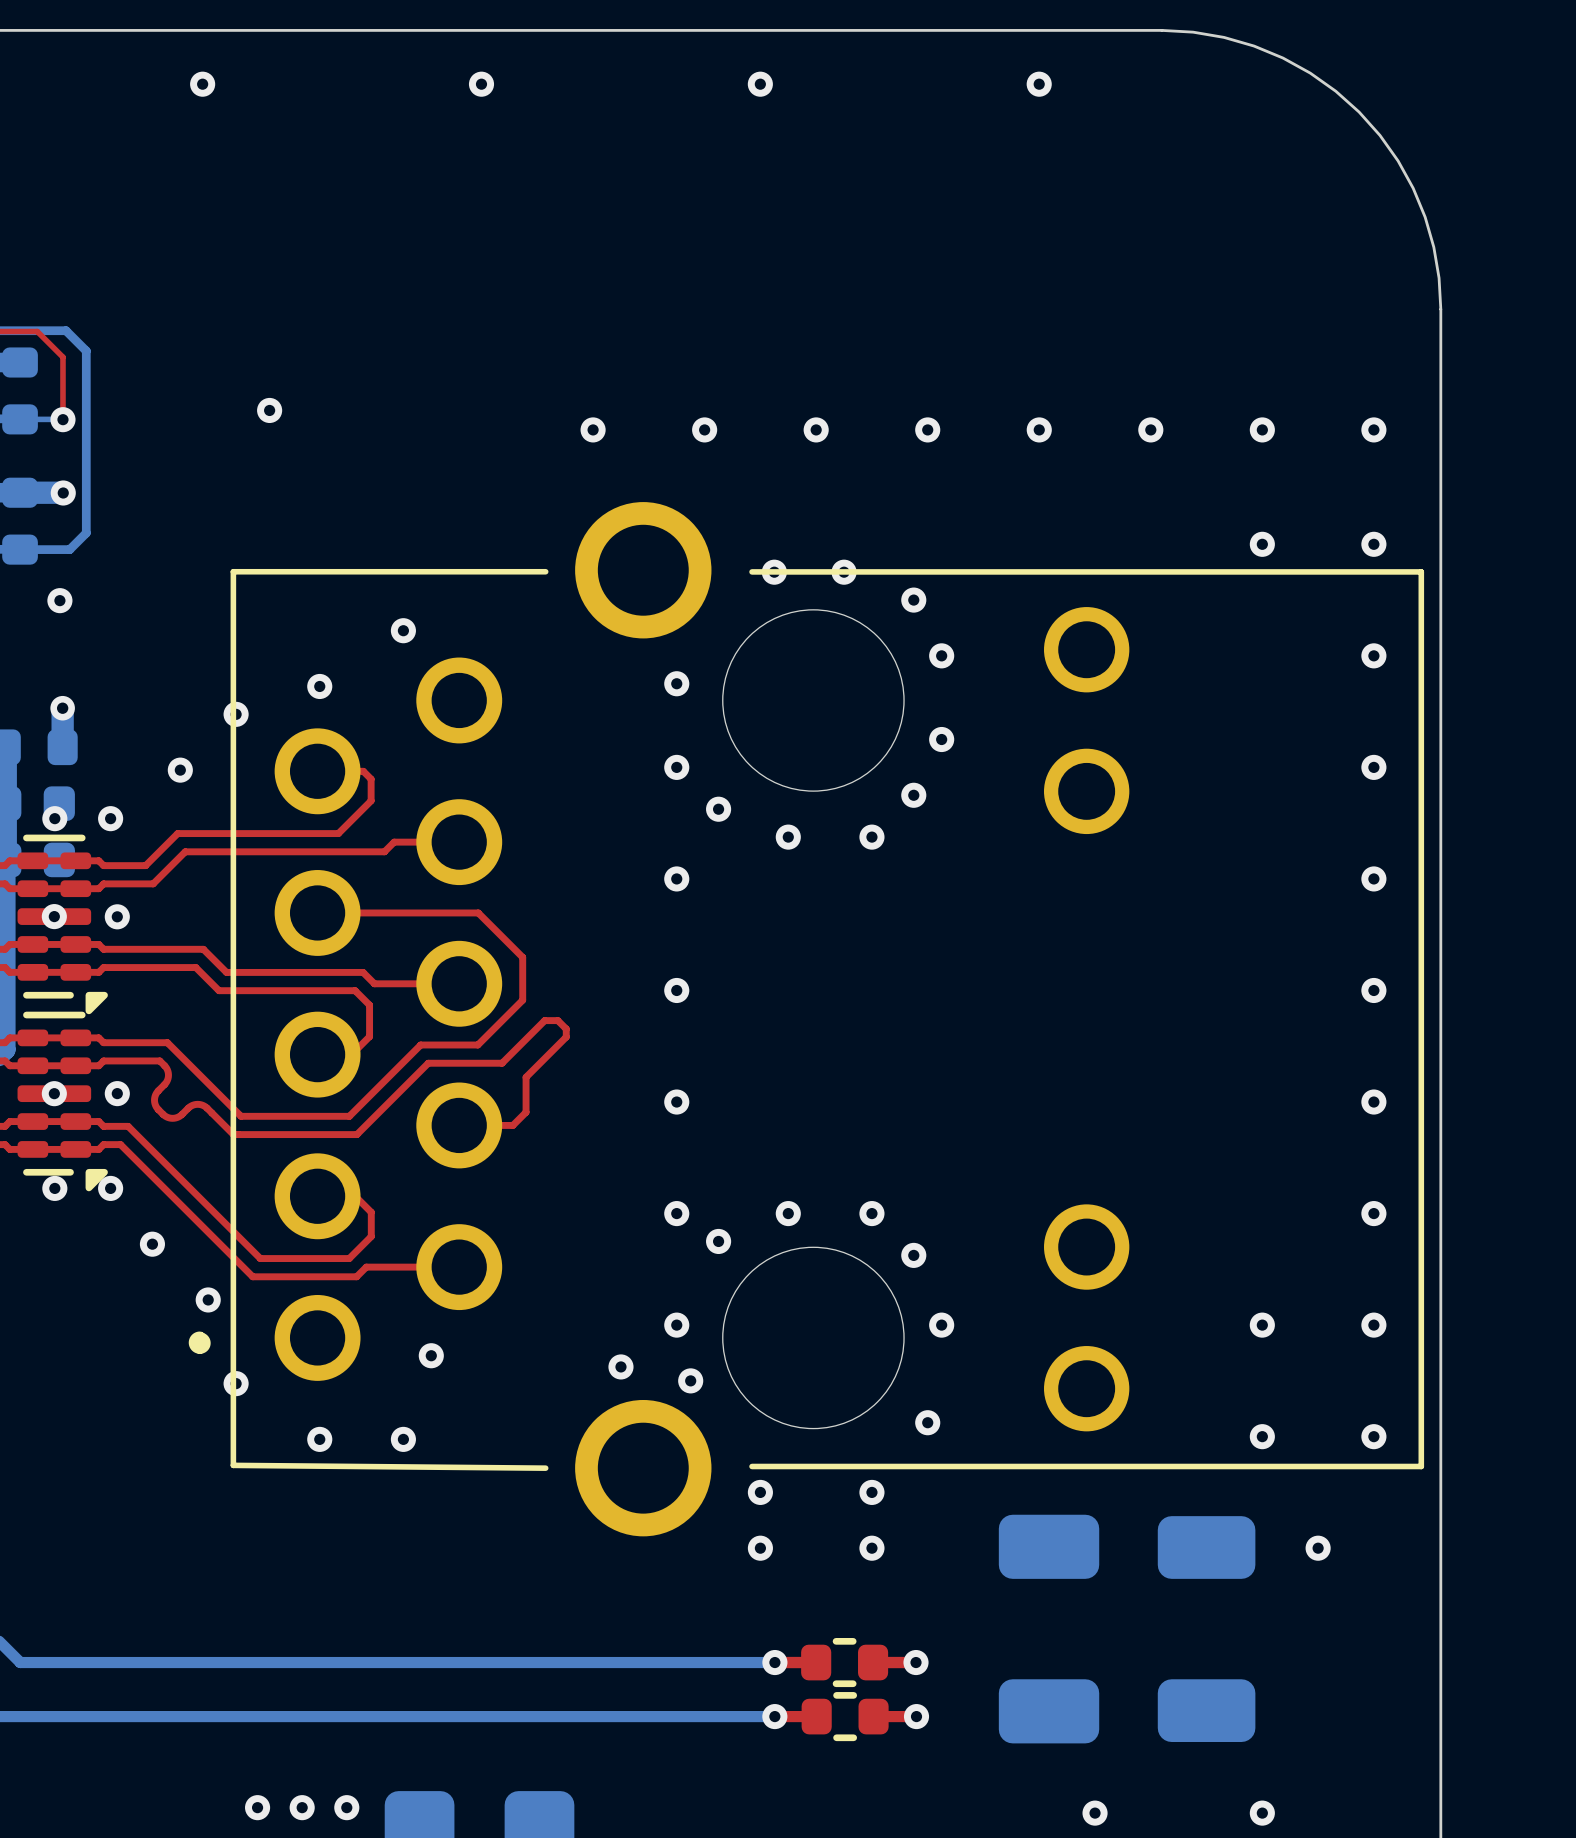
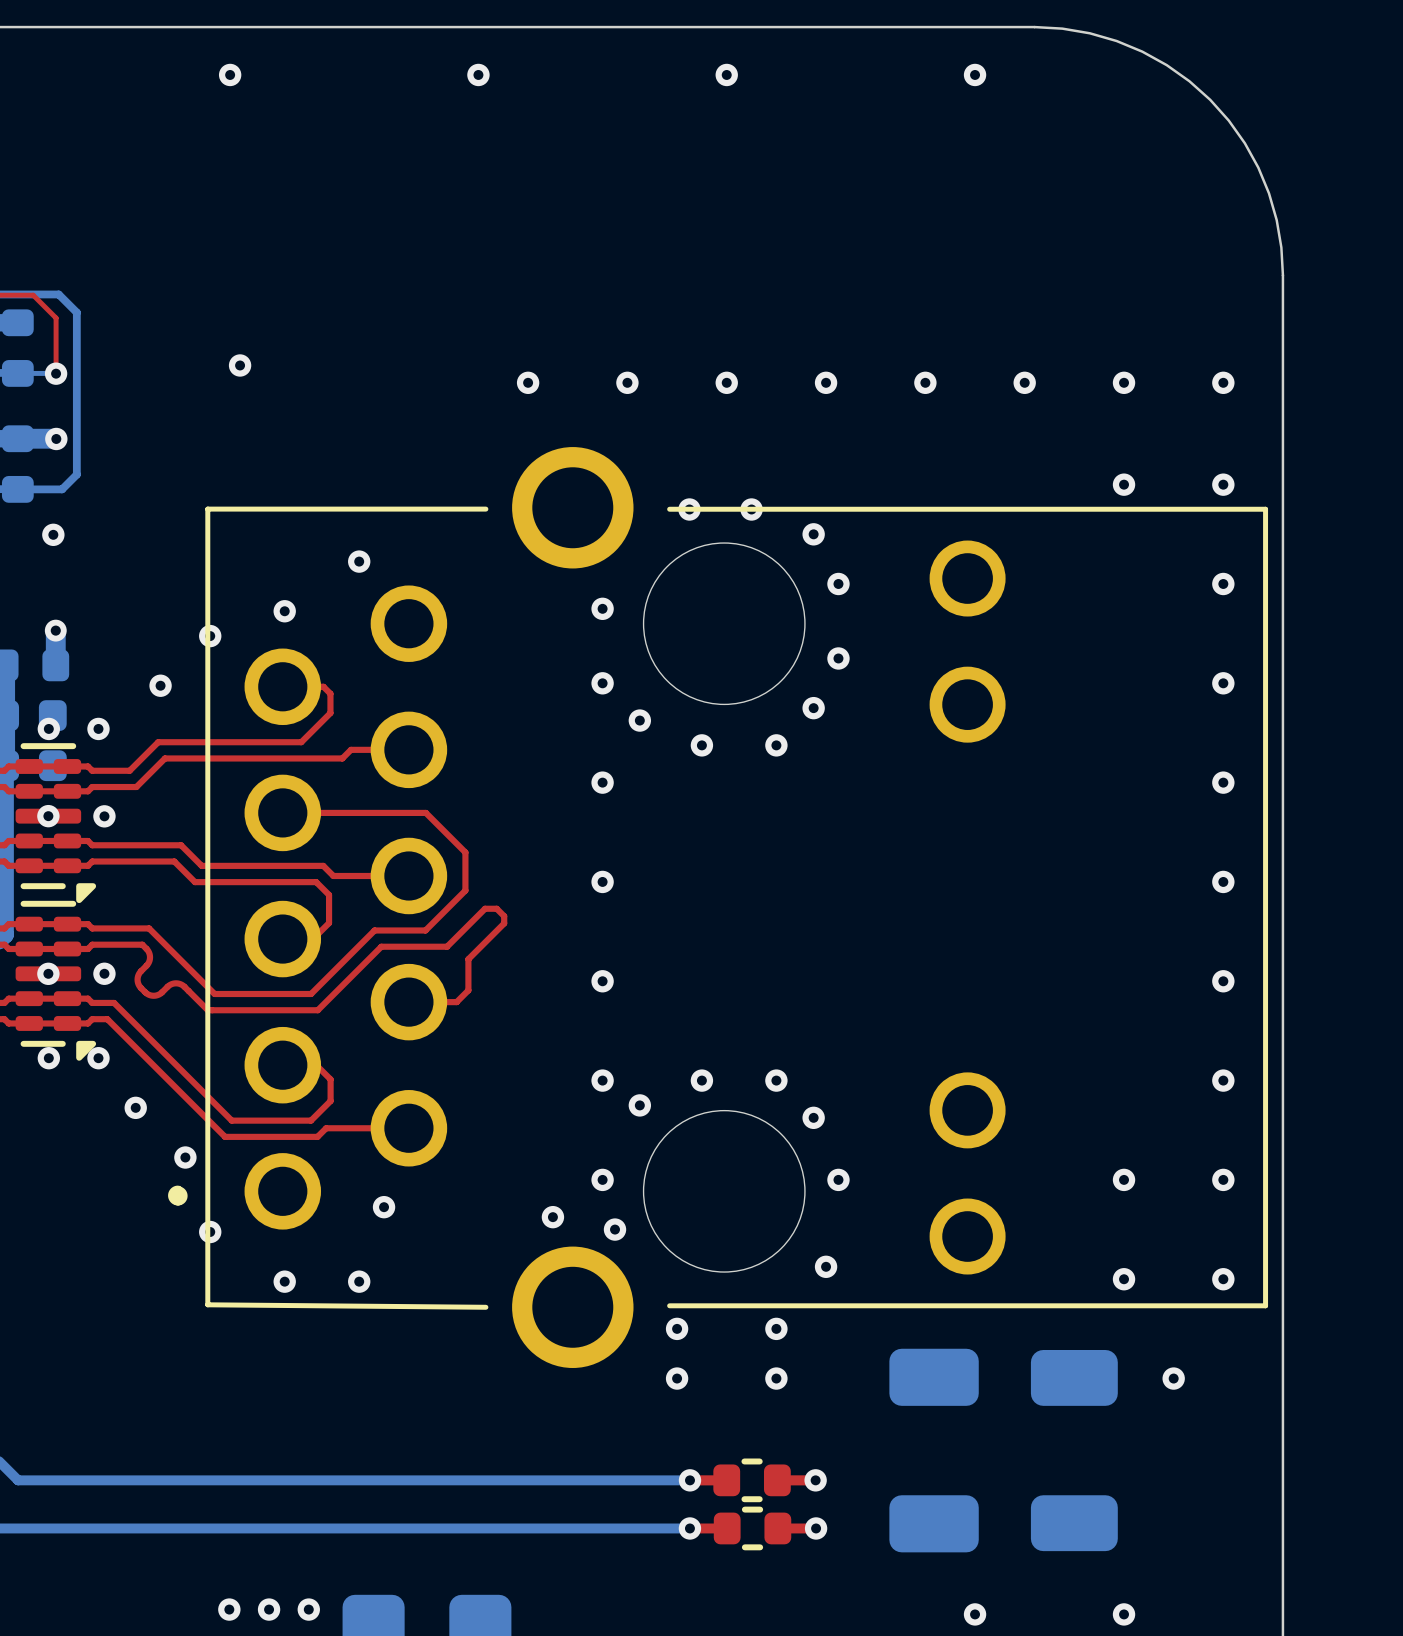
via position: (202, 84) -> (230, 74)
via position: (481, 84) -> (478, 74)
via position: (760, 84) -> (726, 74)
via position: (1039, 84) -> (975, 74)

